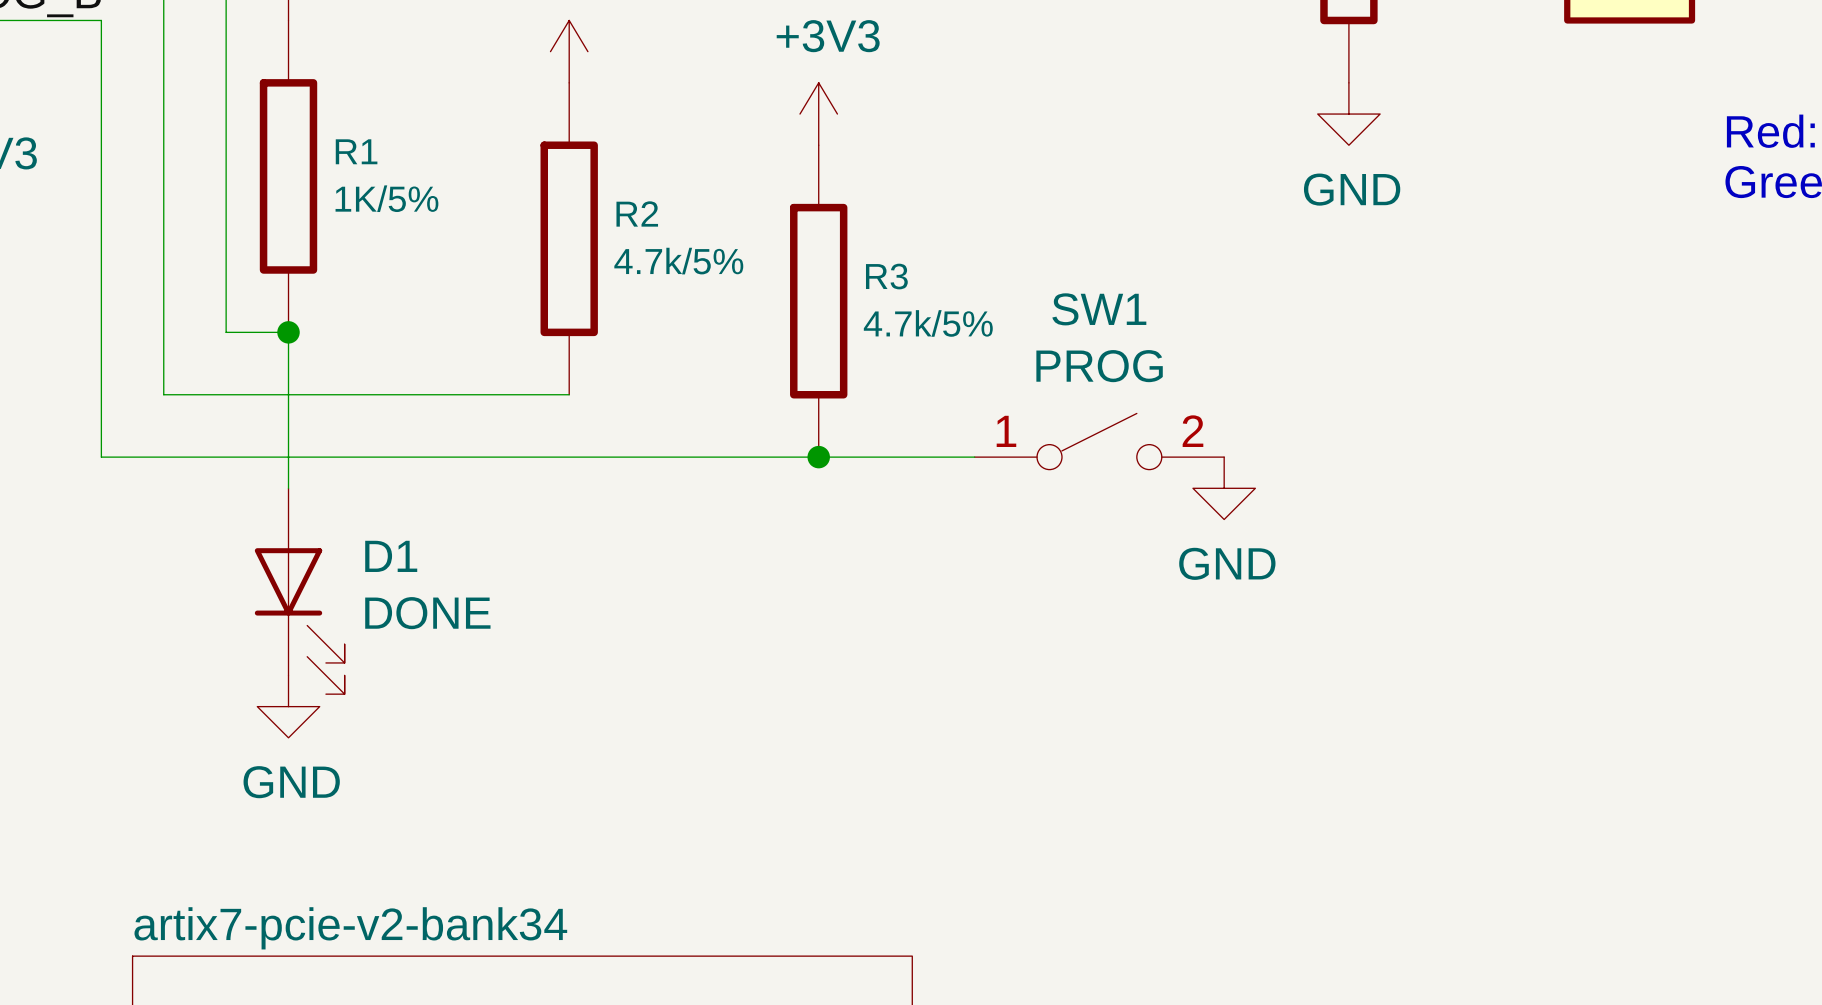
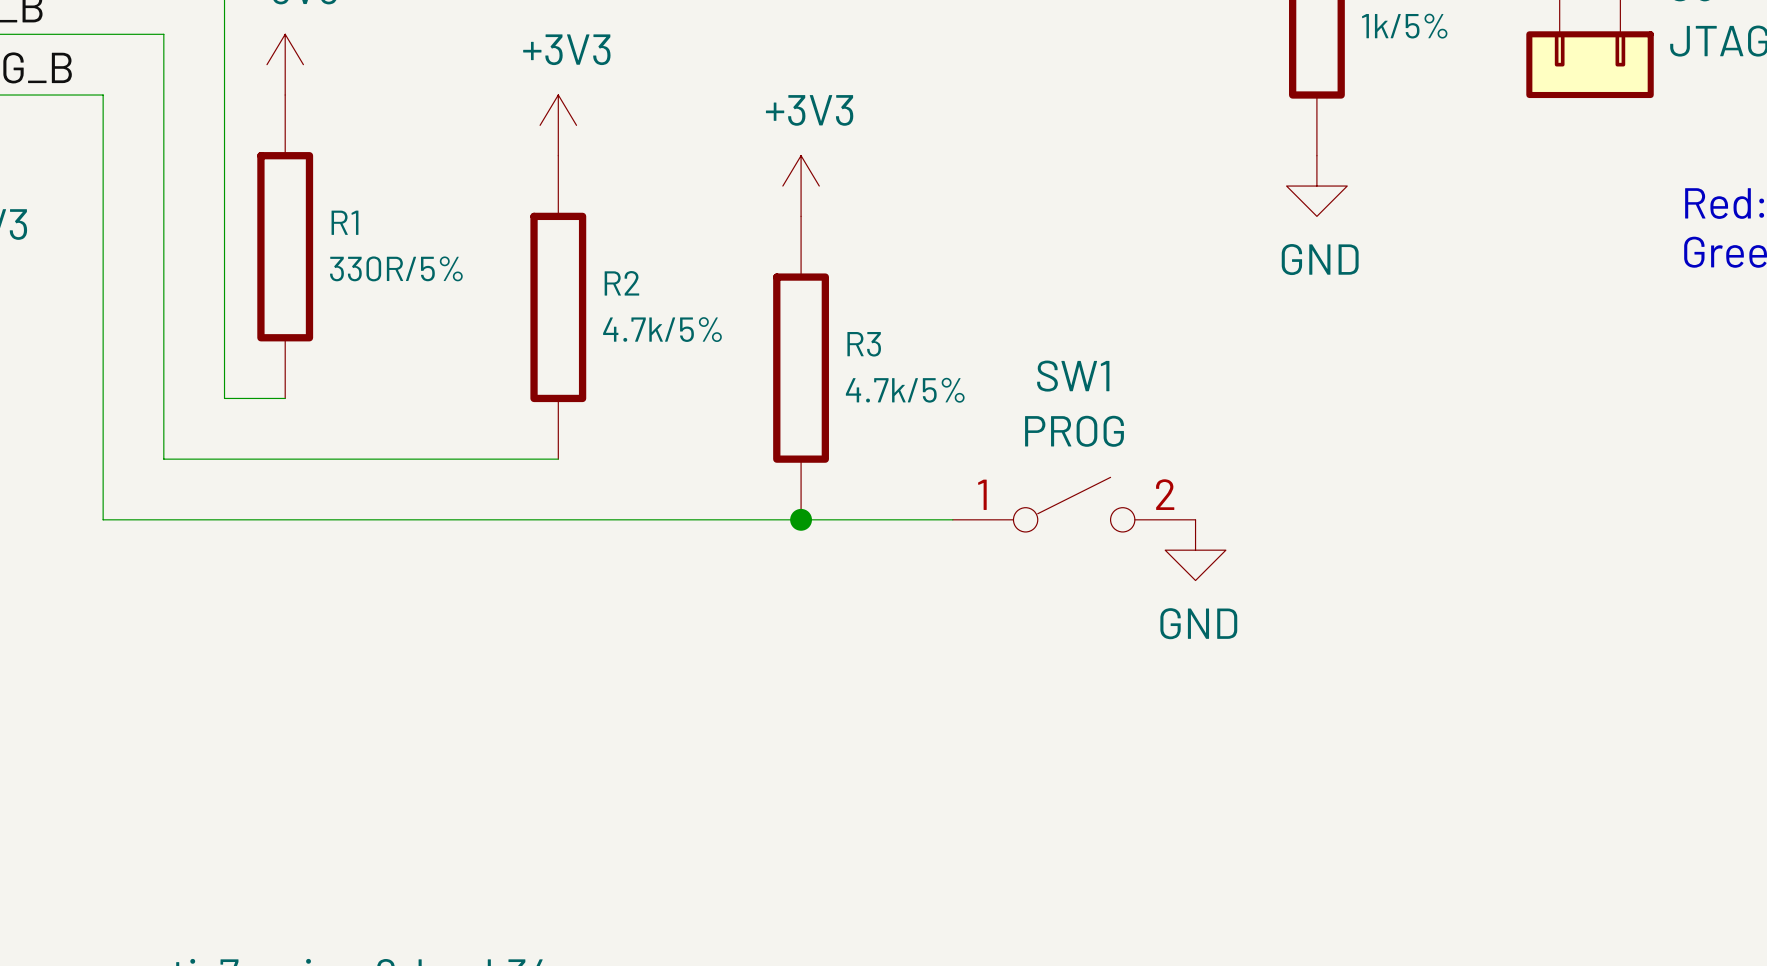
R1 value: 1K/5% (386, 198) -> 330R/5% (396, 268)
wire: (288, 332) (288, 488) -> none
junction: (288, 332) -> none
D1: DONE (299, 591) -> none
power symbol: GND (288, 706) -> none

